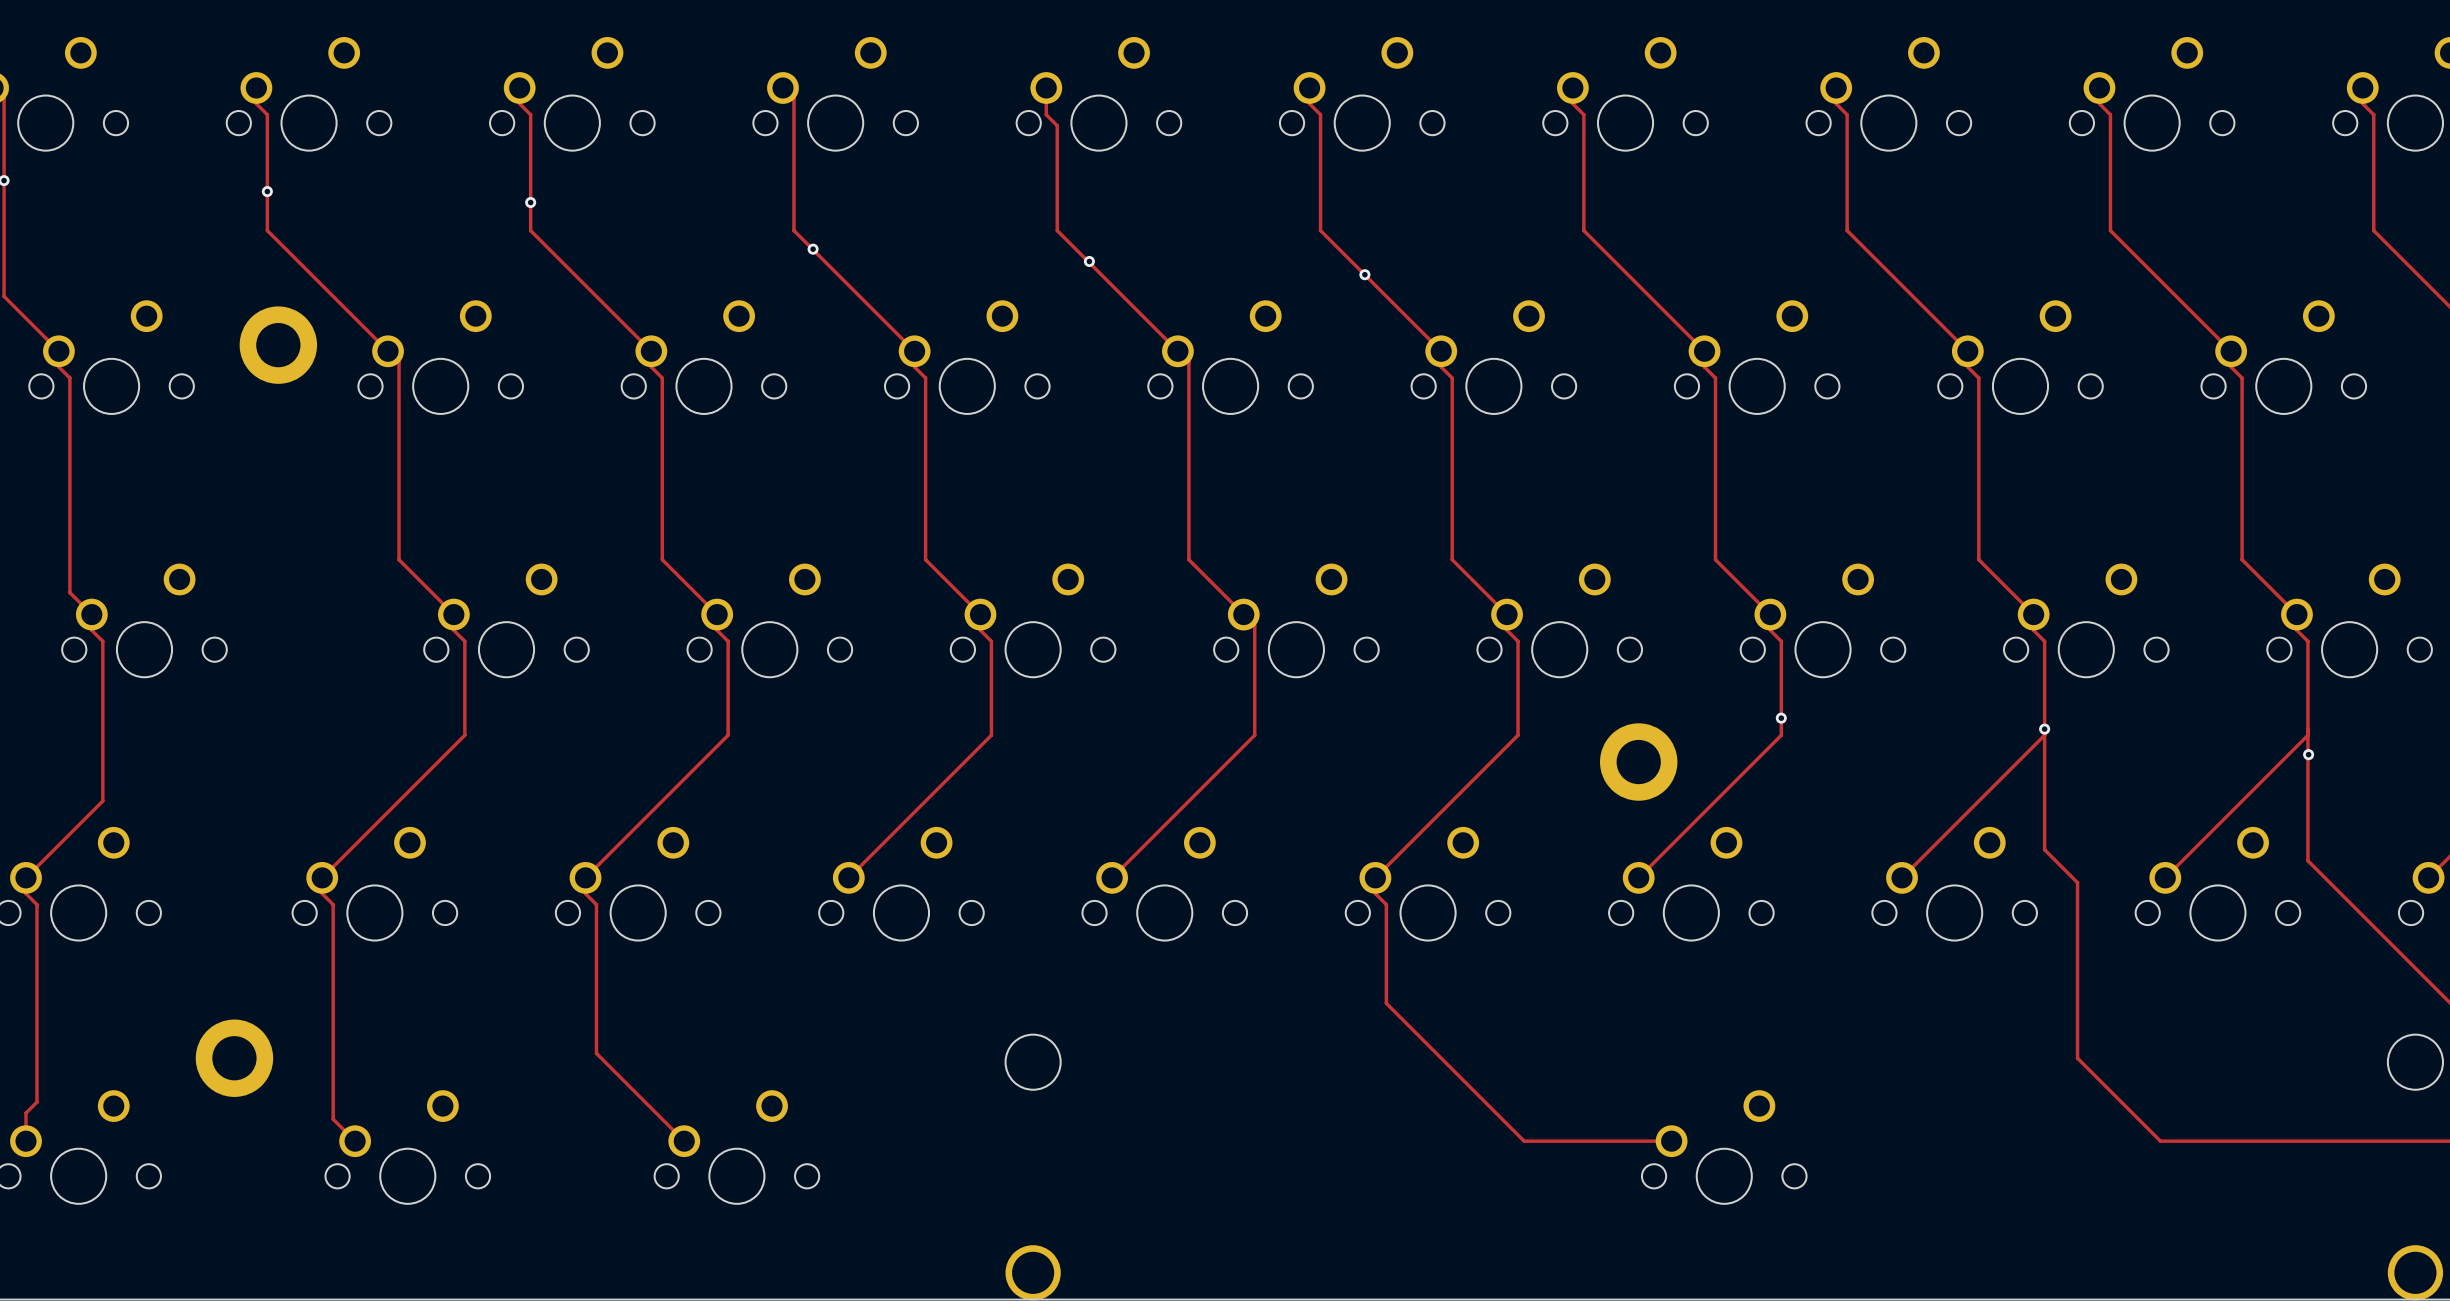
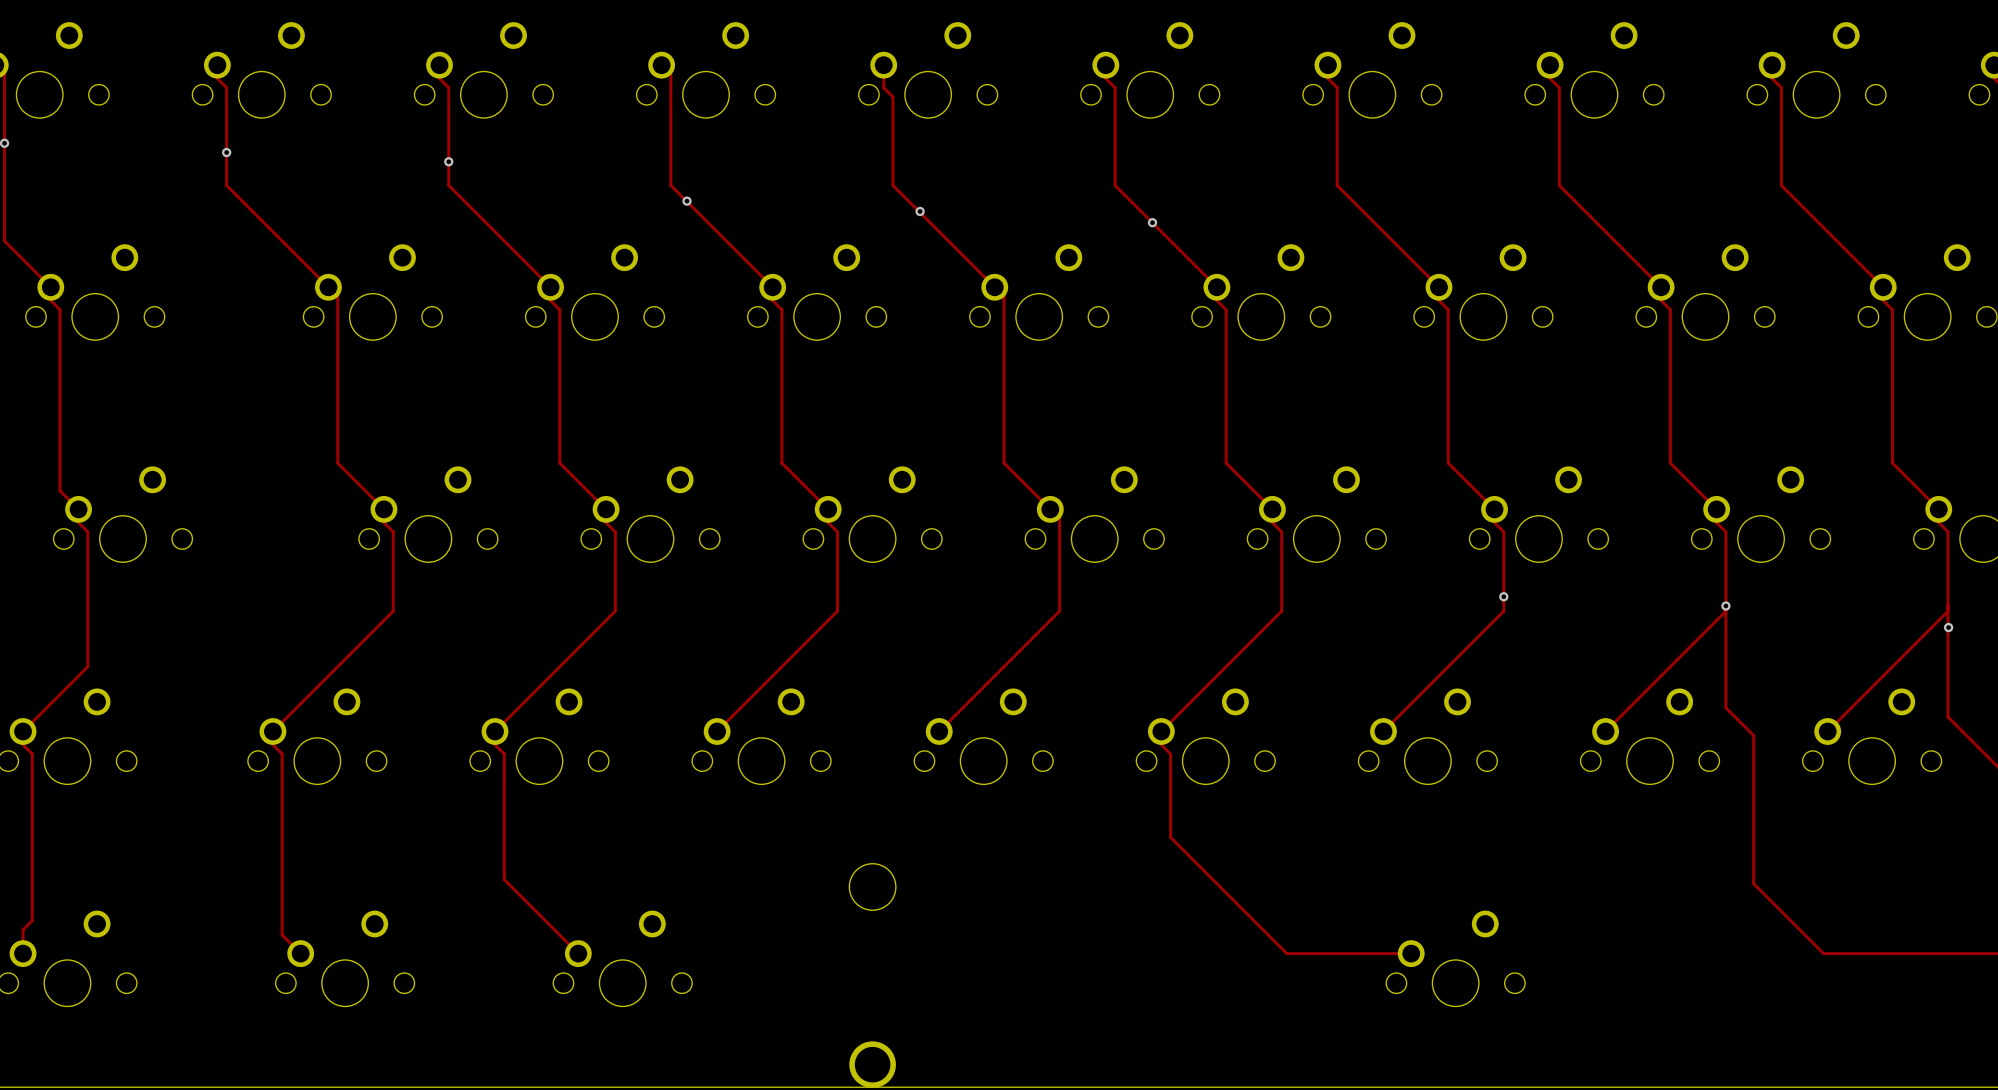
part: (278, 345) -> none
part: (1638, 762) -> none
part: (234, 1058) -> none

